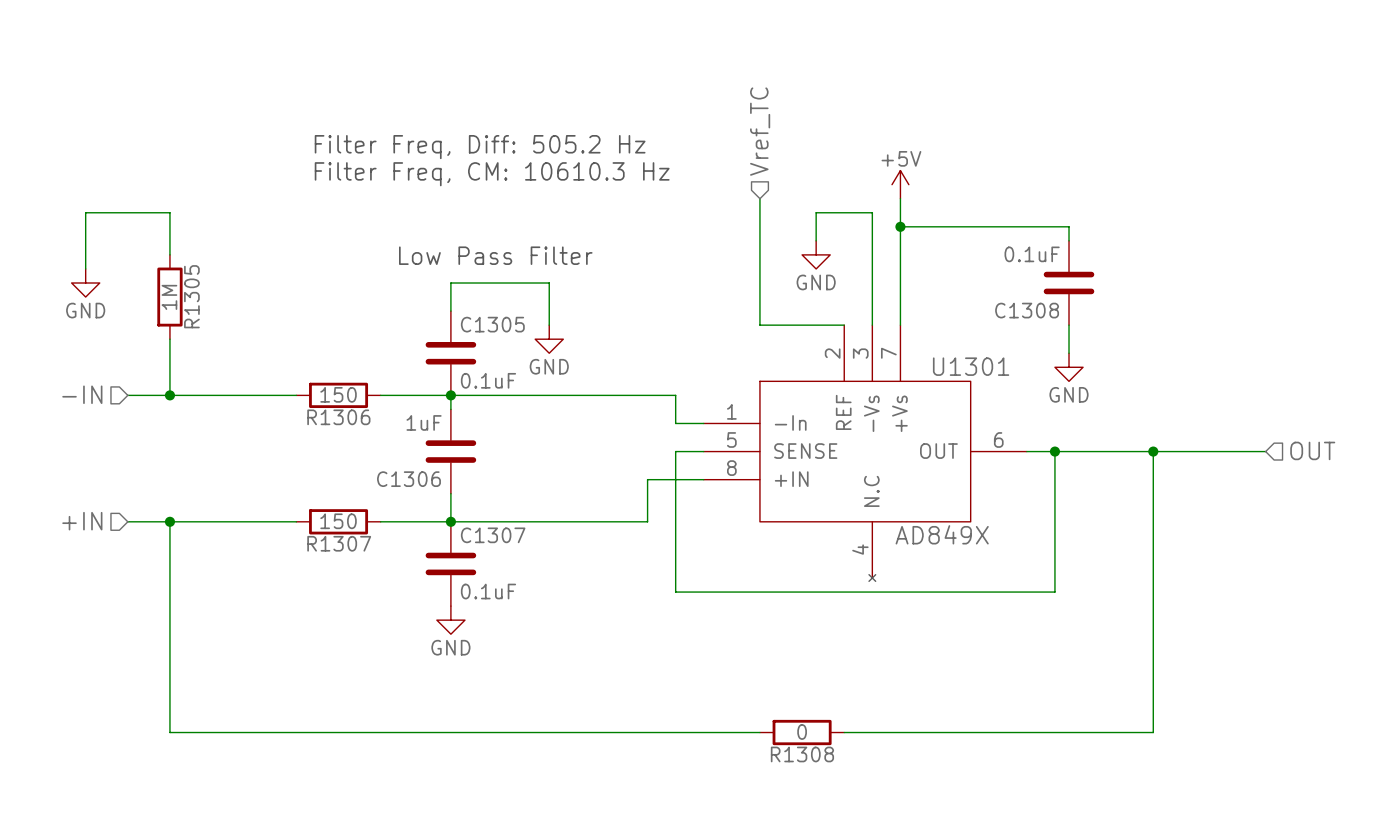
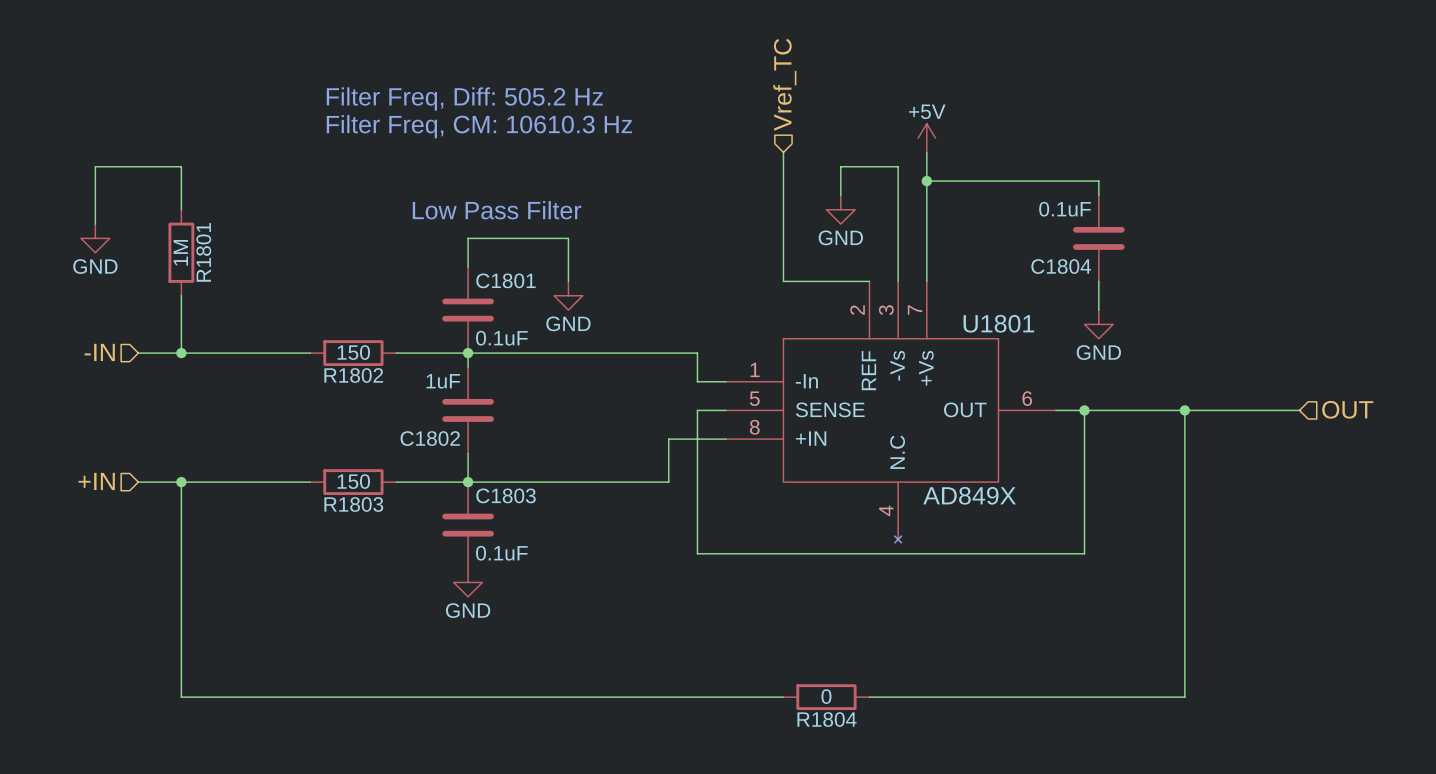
R1305 name: R1305 (191, 296) -> R1801 (203, 252)
C1308 name: C1308 (1027, 310) -> C1804 (1061, 266)
C1305 name: C1305 (492, 324) -> C1801 (505, 280)
U1301 name: U1301 (971, 366) -> U1801 (998, 323)
R1306 name: R1306 (338, 417) -> R1802 (353, 375)
C1306 name: C1306 (409, 479) -> C1802 (430, 438)
C1307 name: C1307 (493, 535) -> C1803 (506, 495)
R1307 name: R1307 (339, 543) -> R1803 (353, 504)
R1308 name: R1308 (802, 754) -> R1804 (827, 719)

